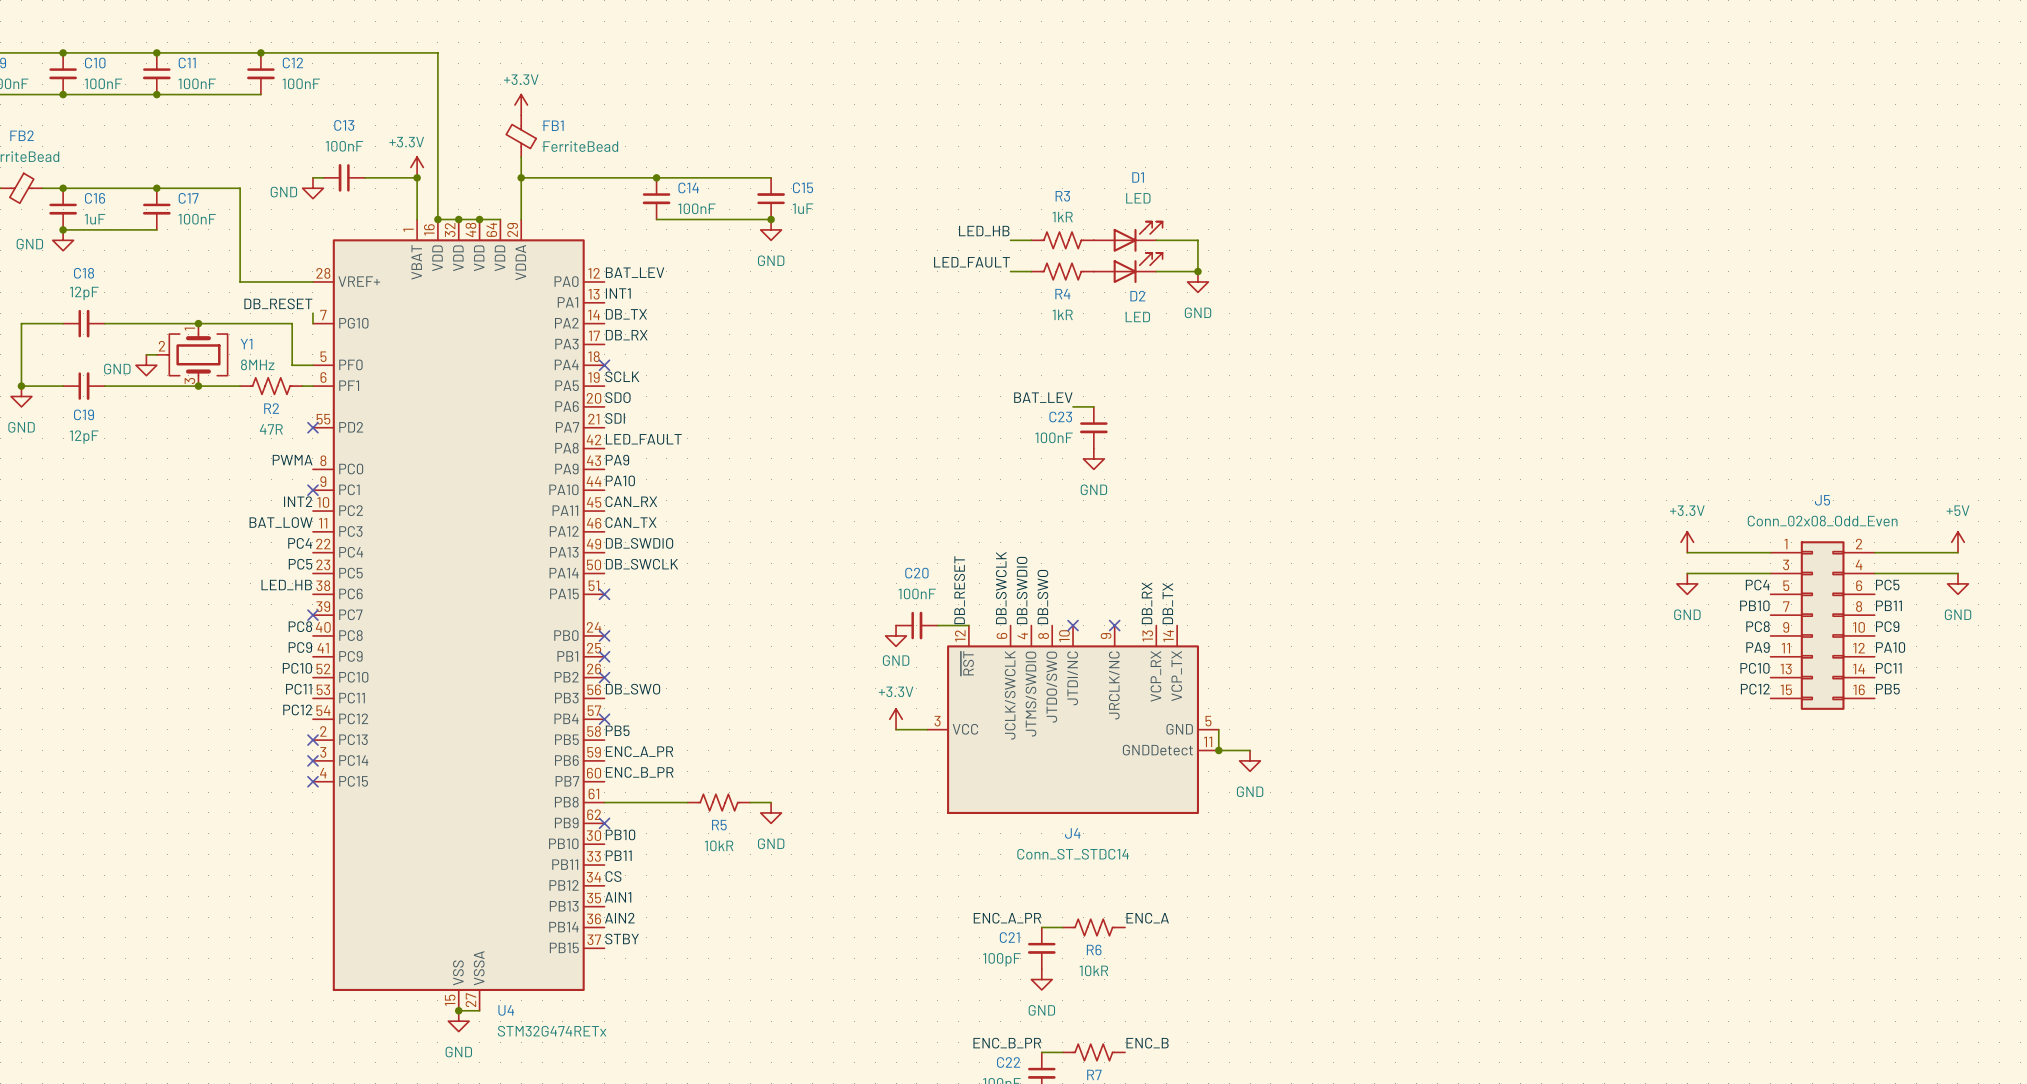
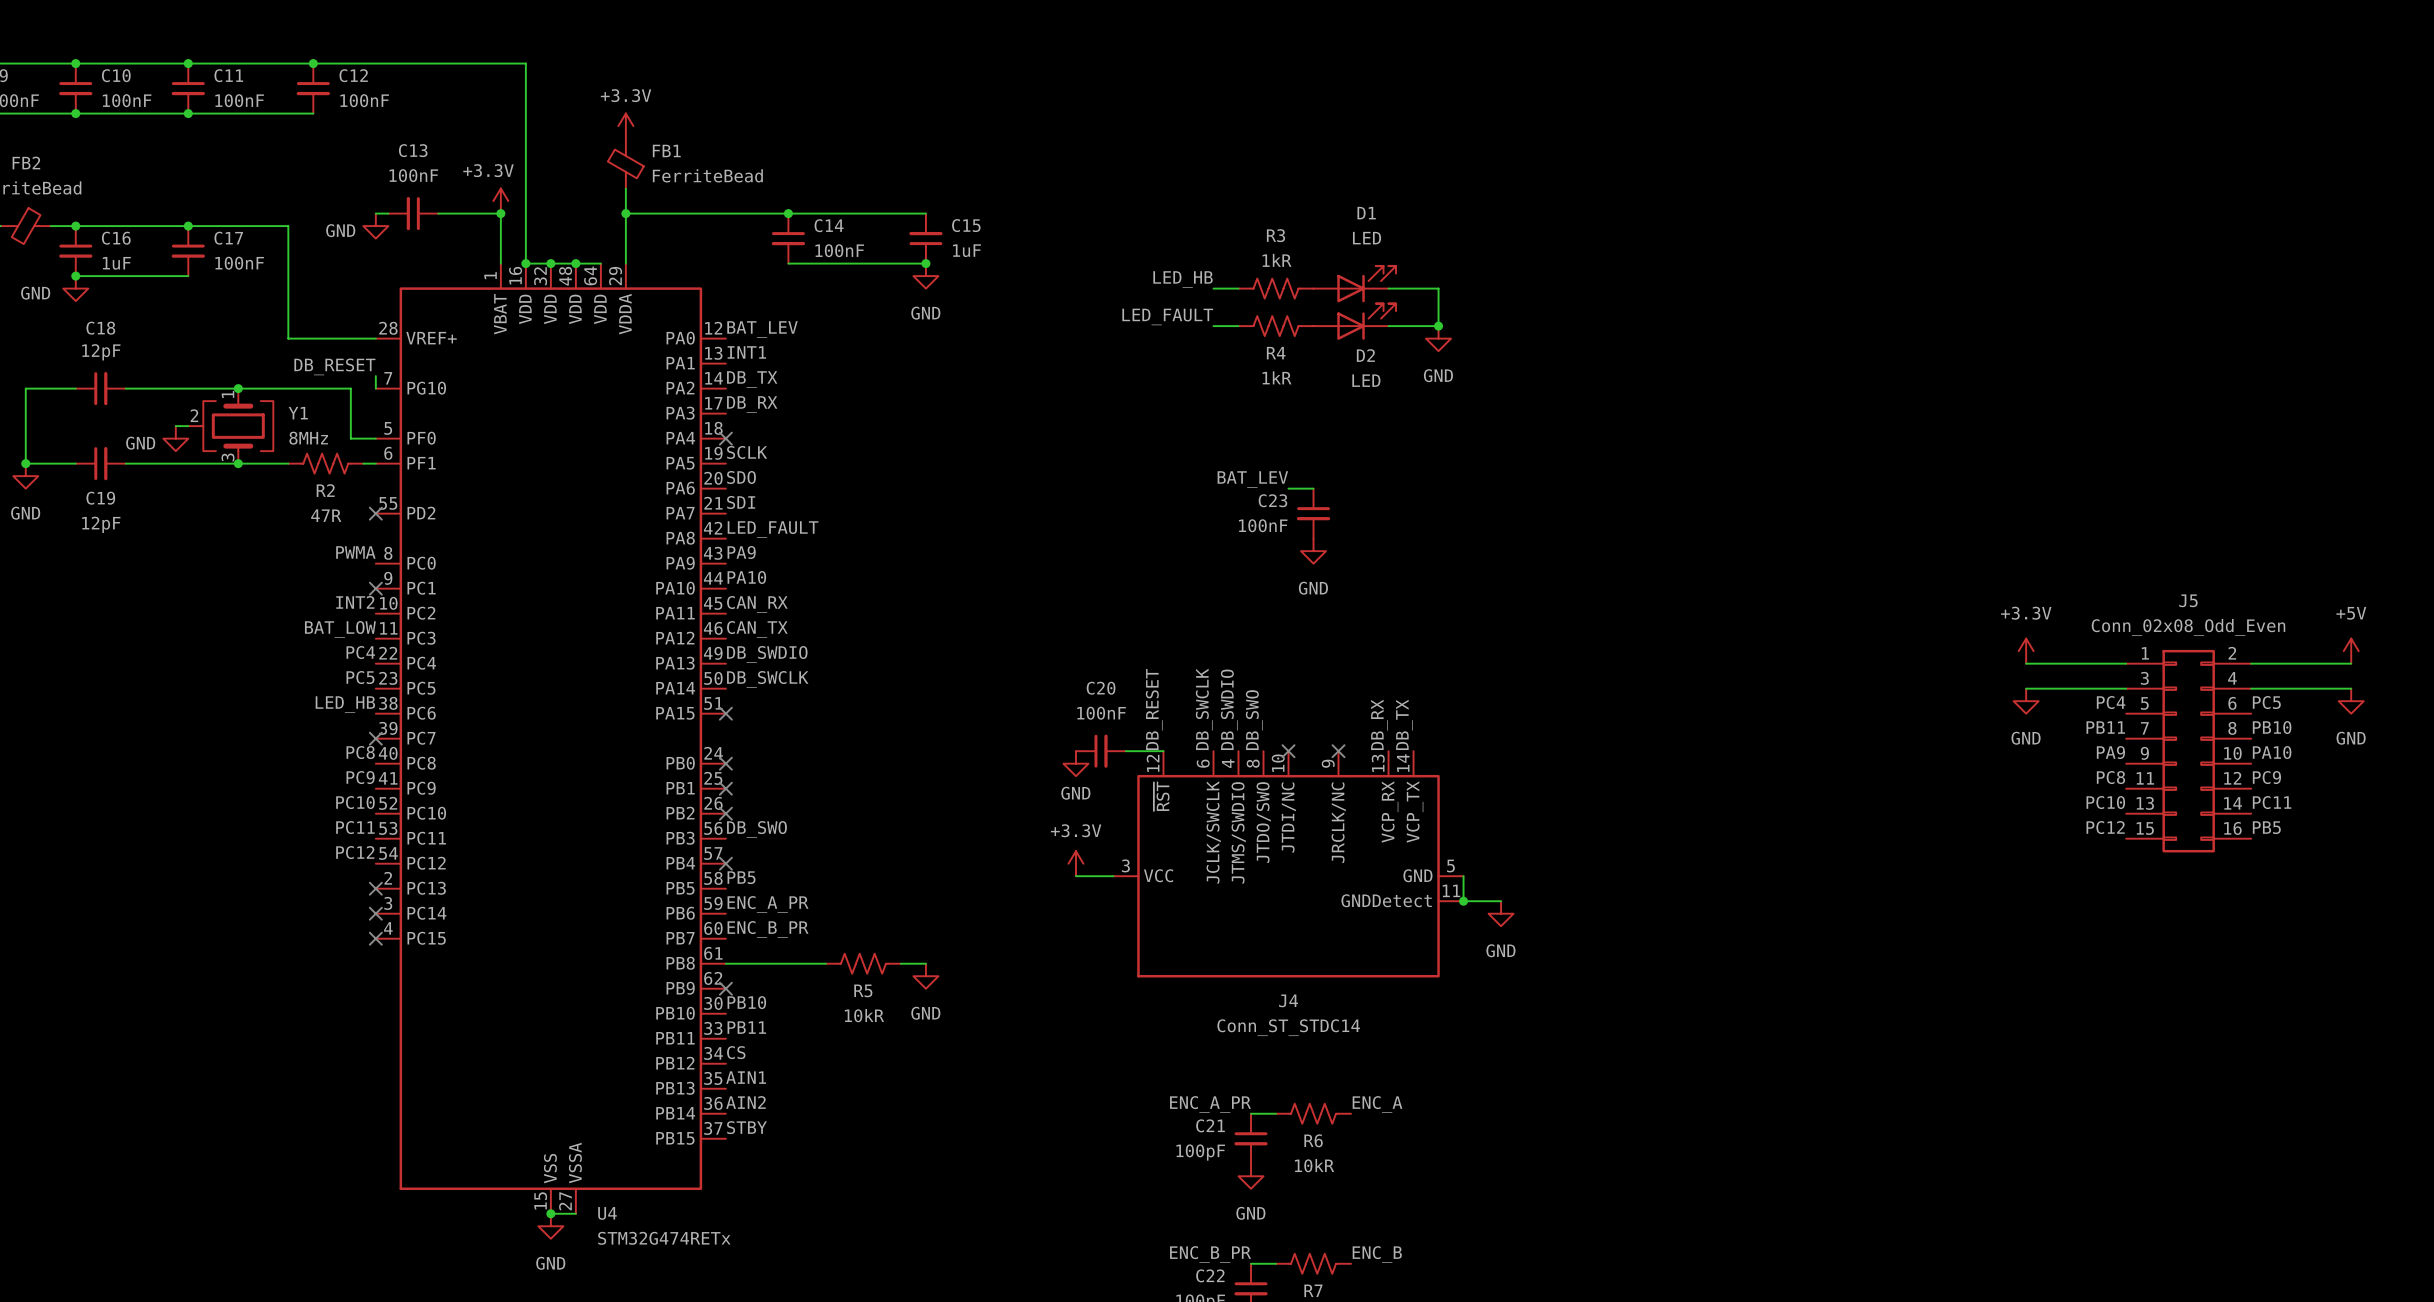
label: PB10 (1754, 605) -> PB11 (2105, 727)
label: PB11 (1888, 605) -> PB10 (2272, 727)
label: PC8 (1757, 626) -> PA9 (2110, 752)
label: PC9 (1887, 626) -> PA10 (2272, 752)
label: PA9 (1757, 647) -> PC8 (2110, 777)
label: PA10 (1890, 647) -> PC9 (2266, 777)

